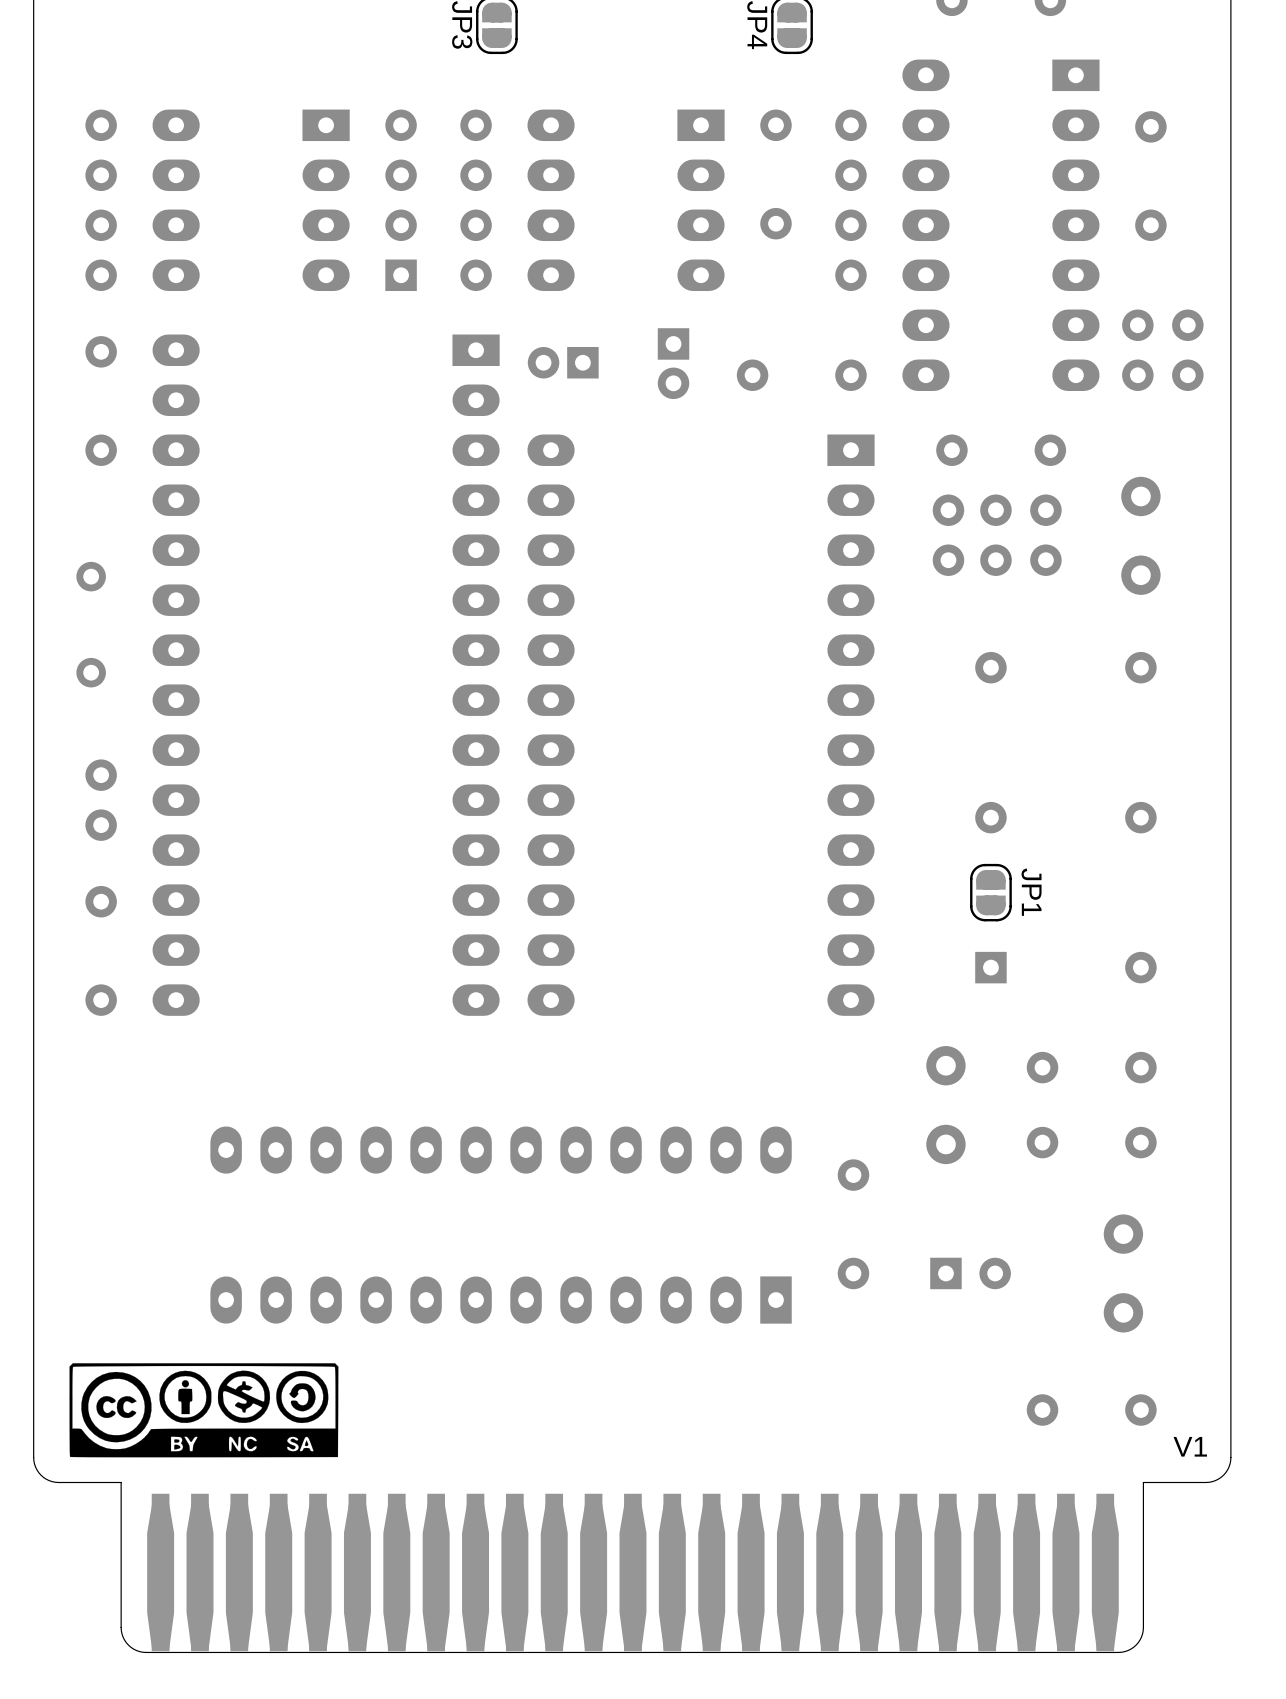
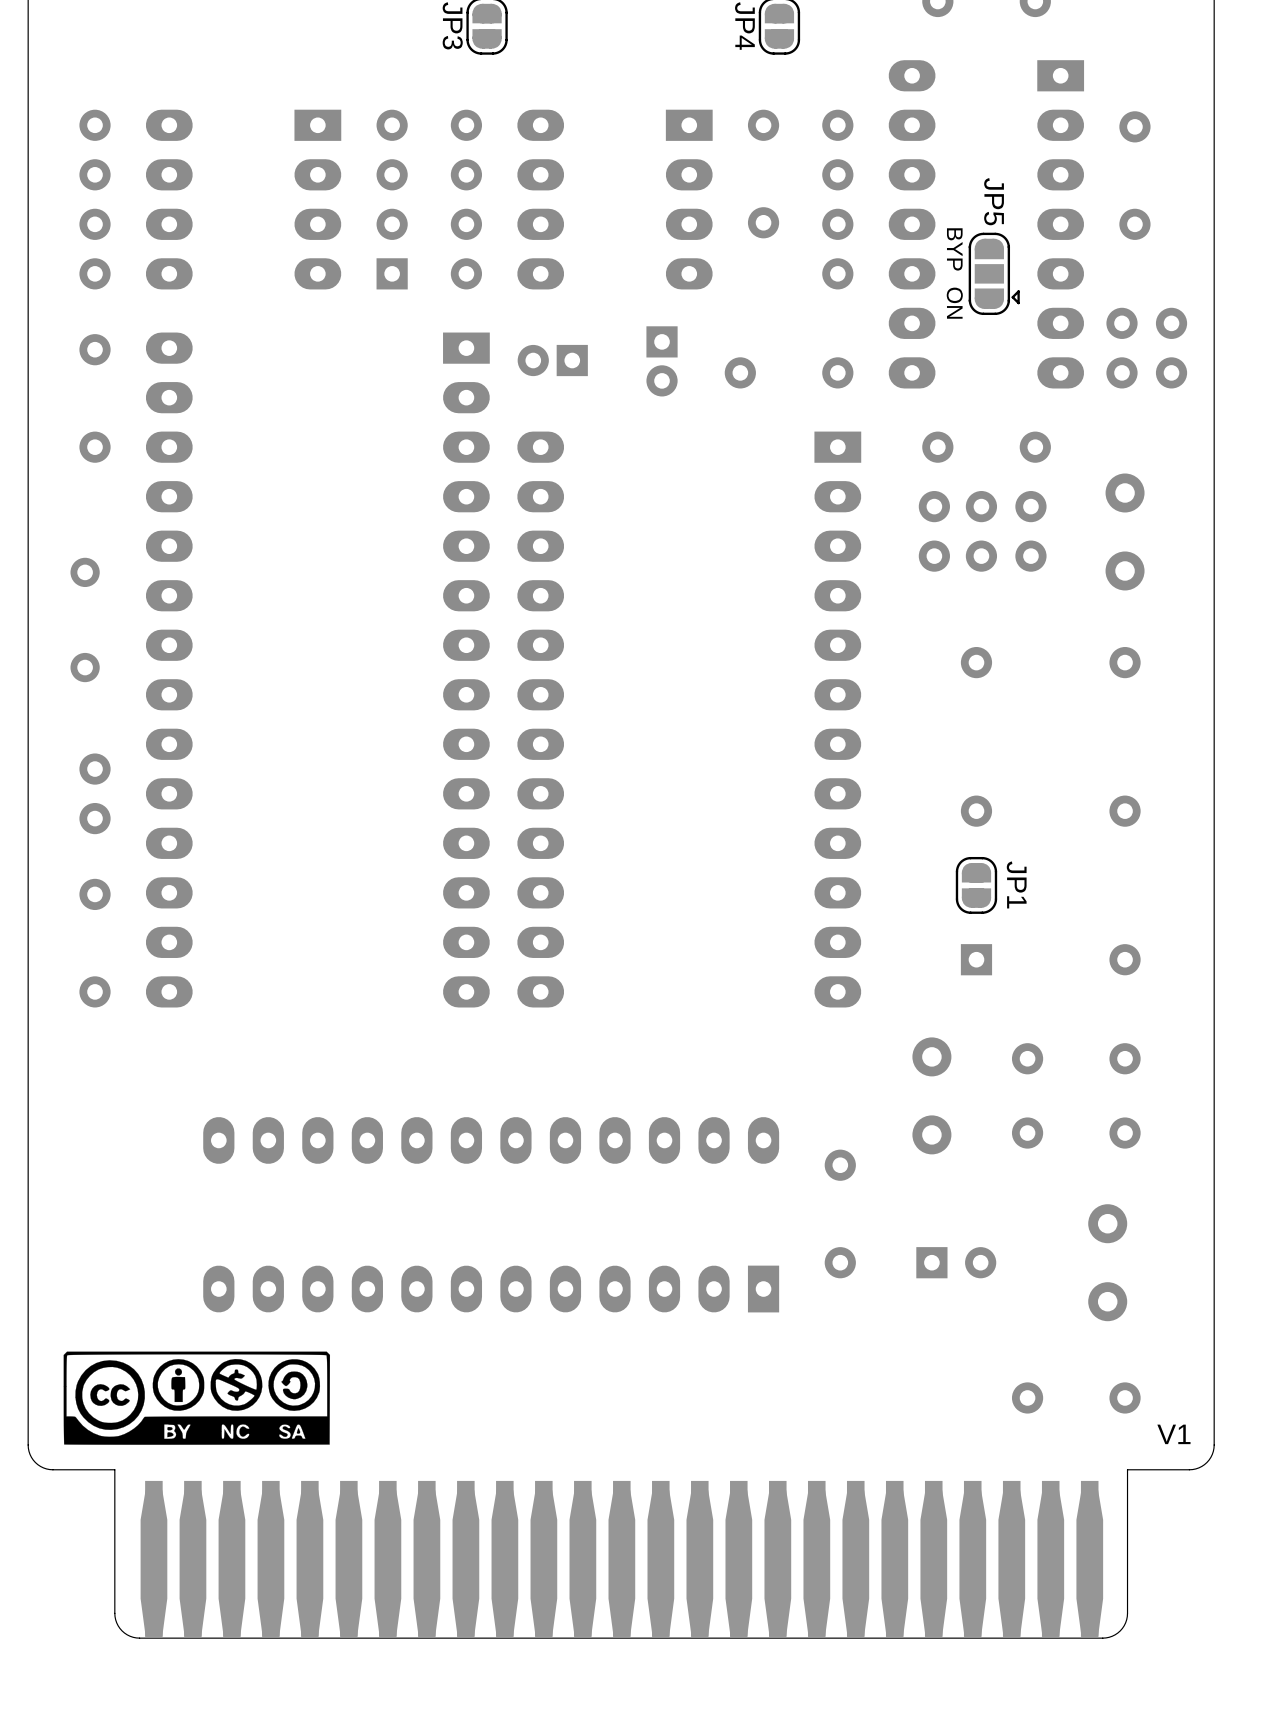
text: none -> BYP (954, 249)
JP5: none -> (994, 273)
text: none -> ON (954, 303)

